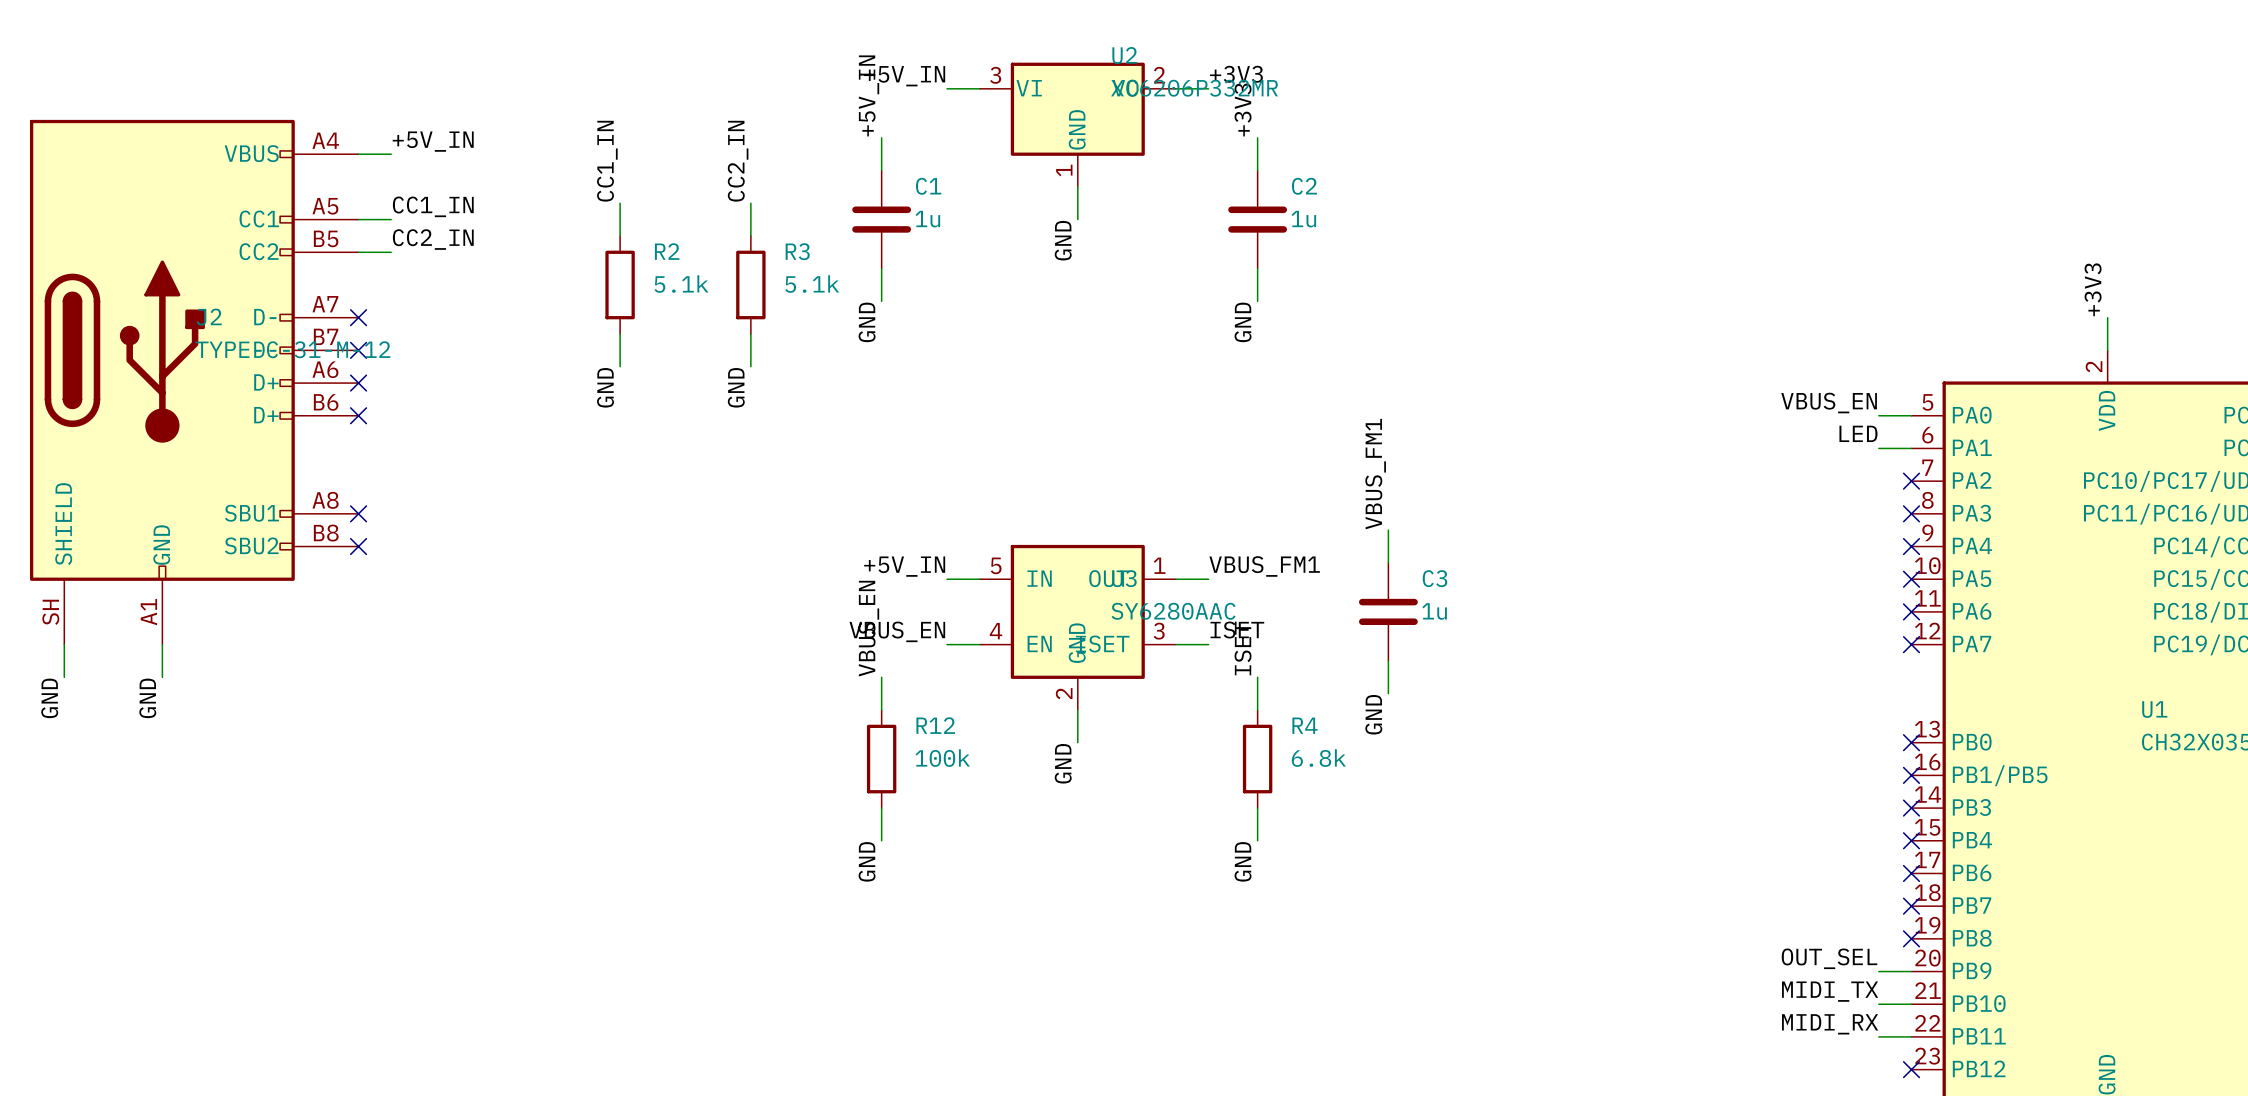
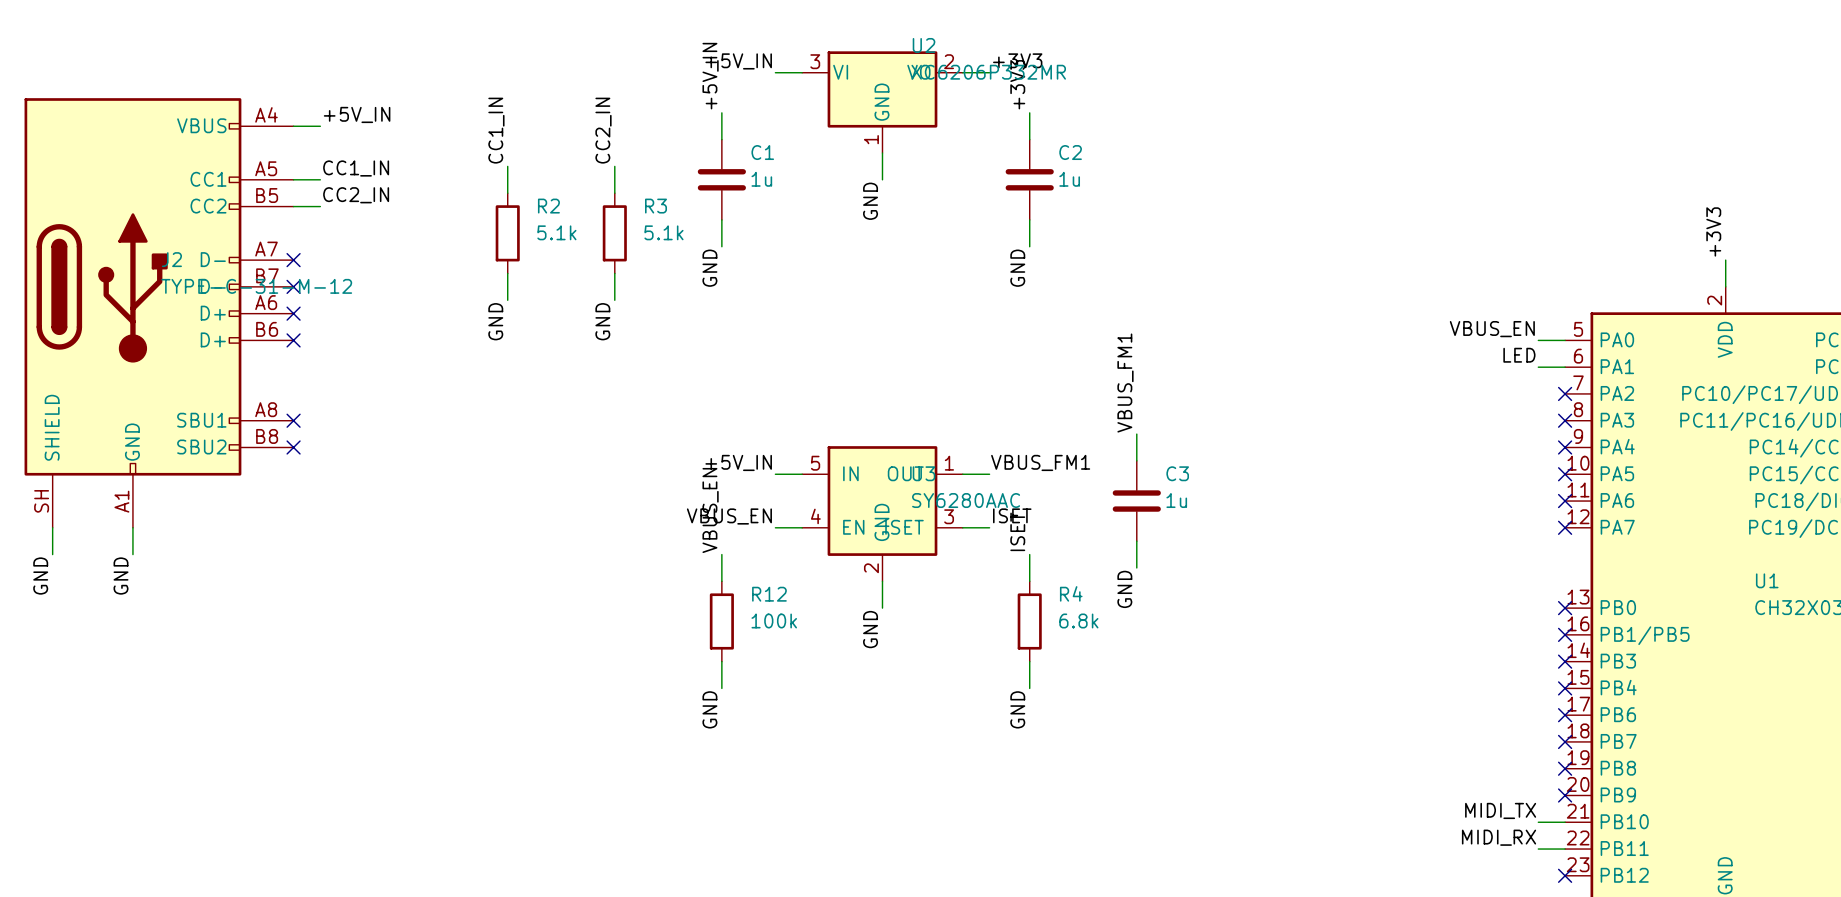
label: OUT_SEL (1829, 958) -> none
wire: (1878, 971) (1911, 971) -> none
no-connect mark: none -> (1565, 795)

